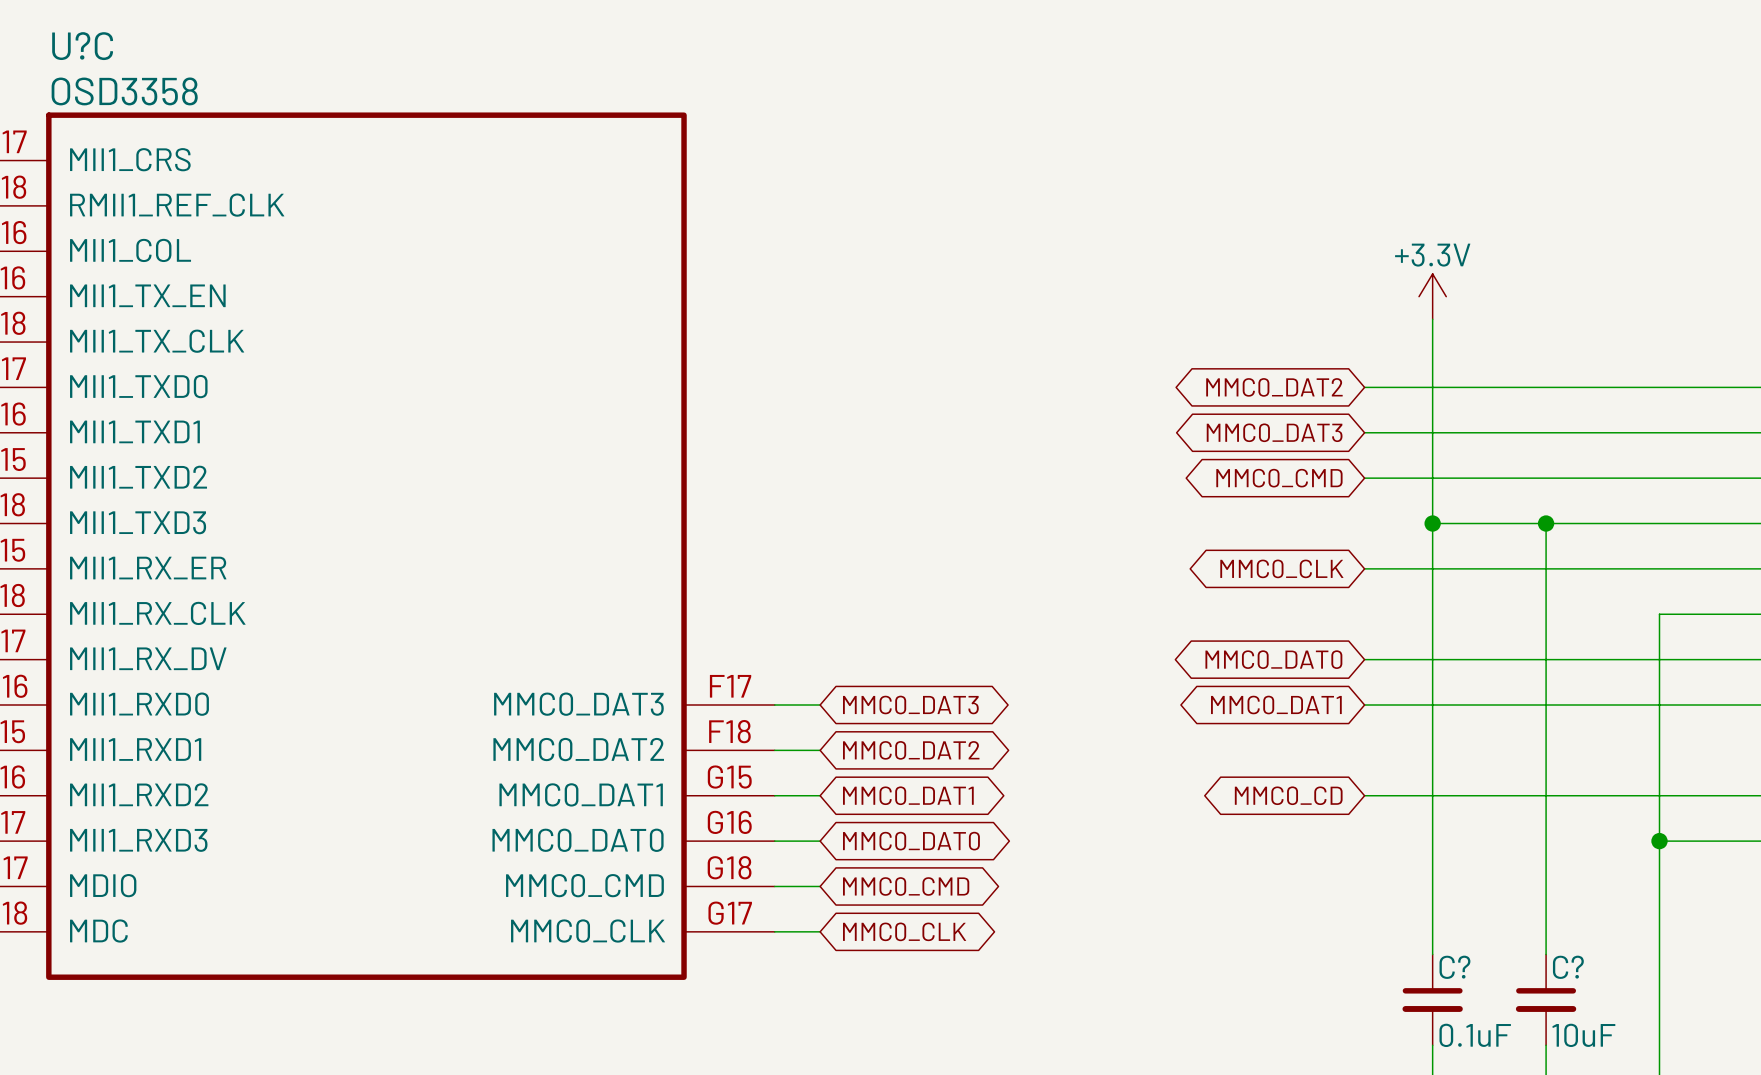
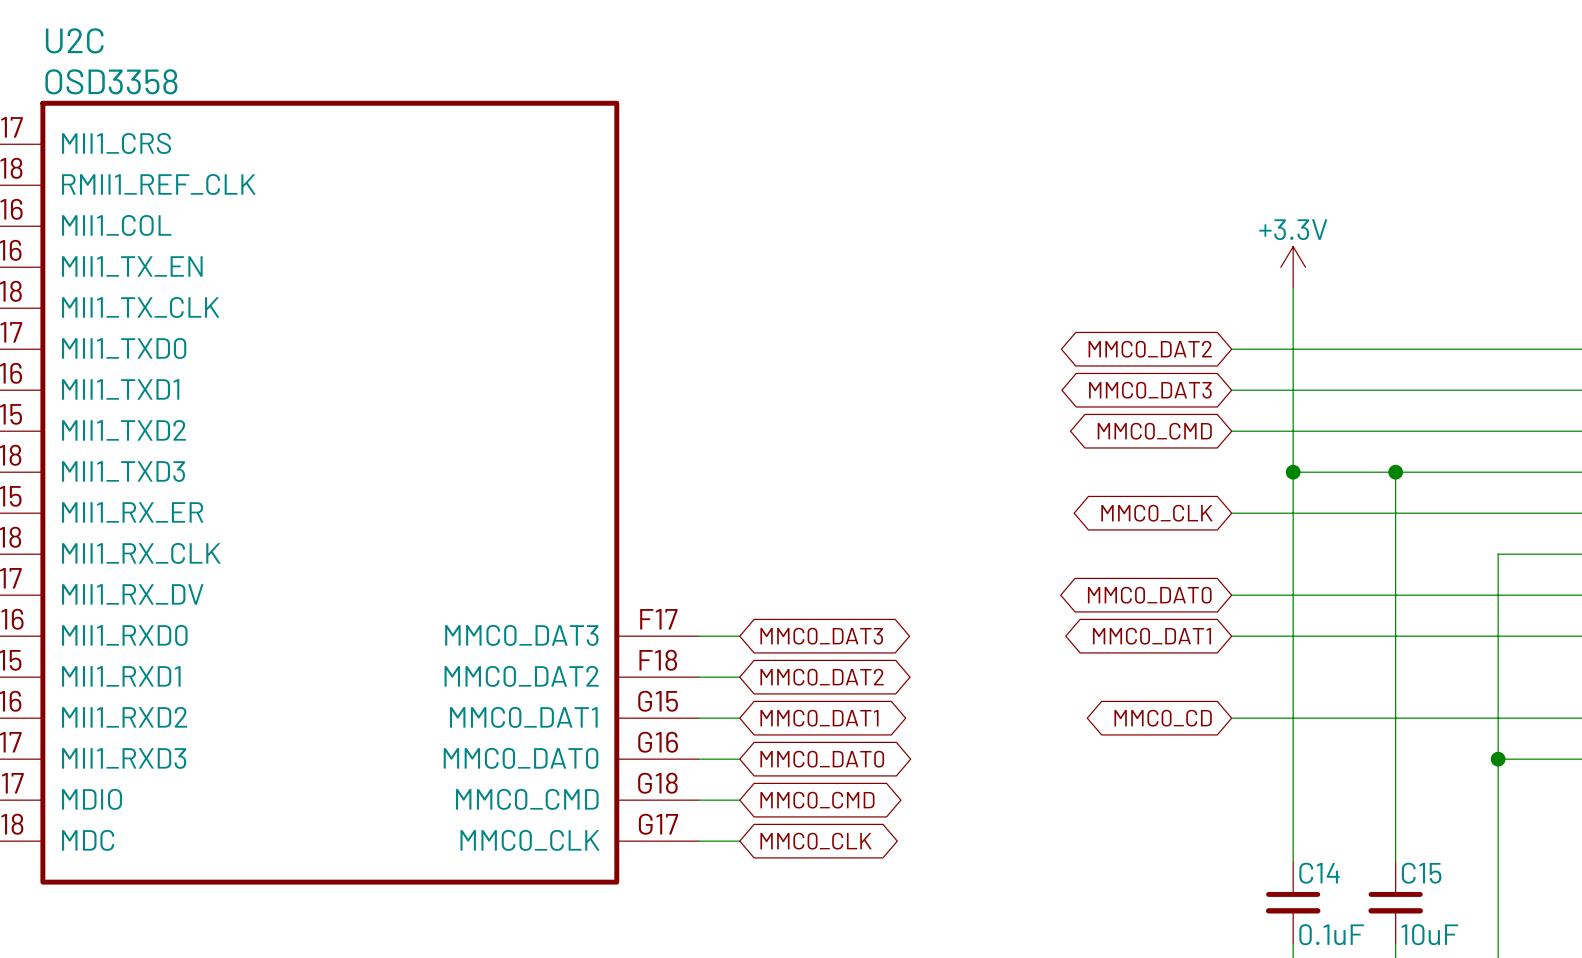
U?C name: U?C (82, 46) -> U2C (74, 40)
C? name: C? (1454, 967) -> C14 (1319, 873)
C? name: C? (1568, 967) -> C15 (1421, 873)

